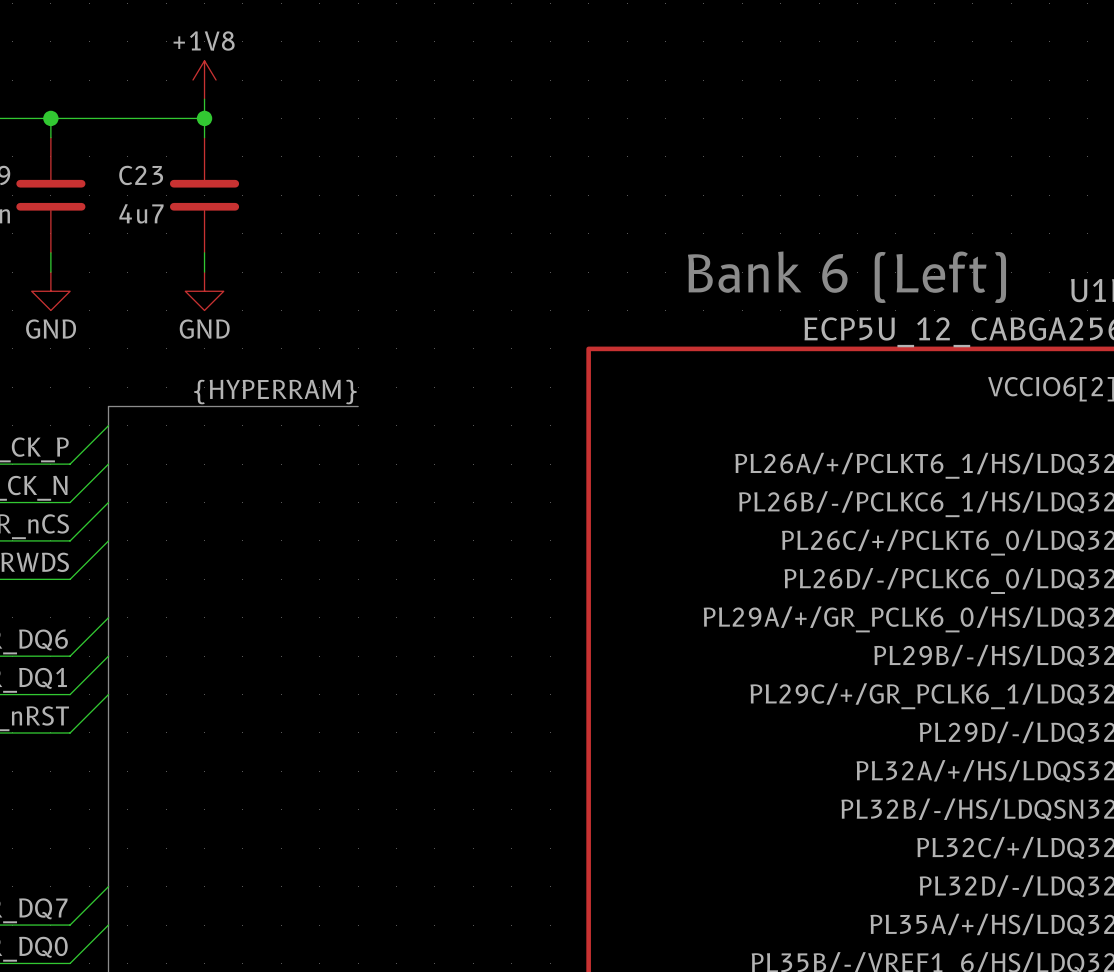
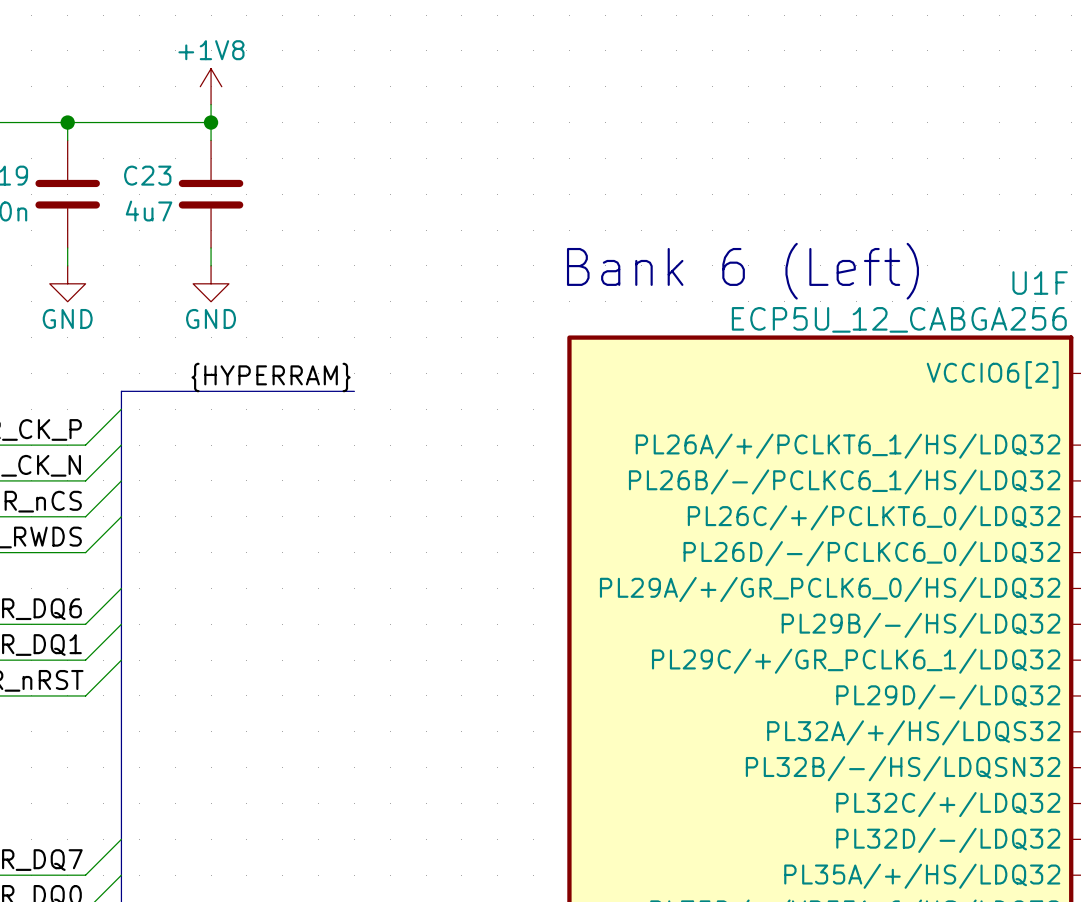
text position: Bank 6 (Left) (847, 277) -> Bank 6 (Left) (742, 271)

